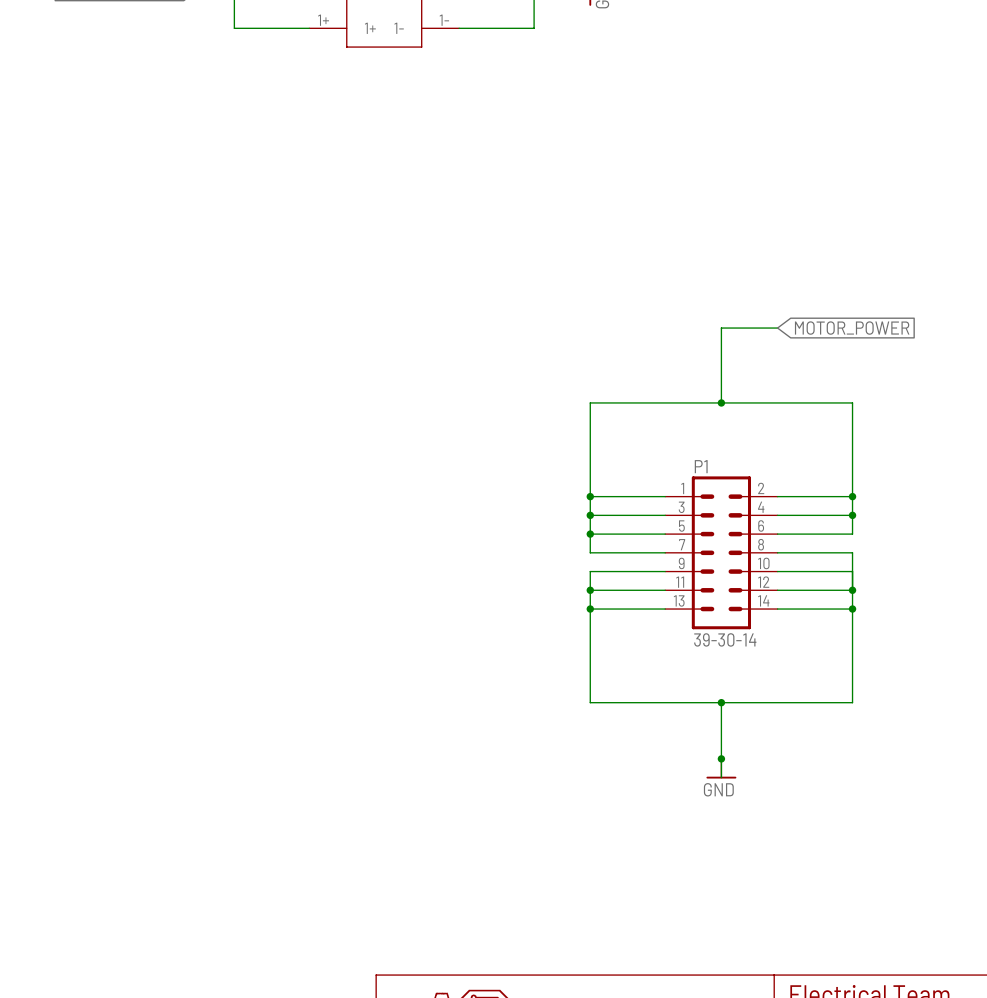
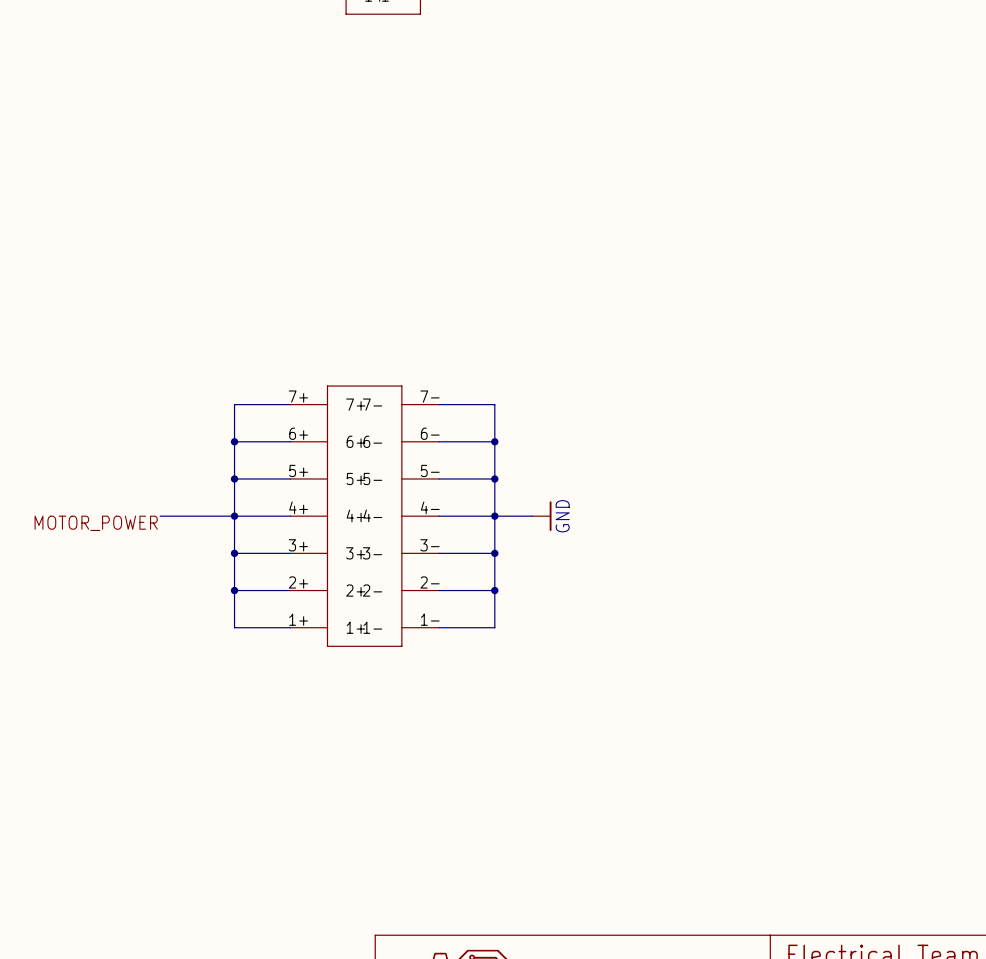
wire: (777, 328) (721, 328) (721, 402) -> none
global label: MOTOR_POWER (852, 328) -> none
junction: (721, 402) -> none
wire: none -> (290, 404) (234, 404) (234, 627) (290, 627)
wire: none -> (439, 404) (494, 404) (494, 627) (439, 627)
wire: none -> (234, 441) (290, 441)
junction: none -> (234, 441)
wire: none -> (439, 441) (494, 441)
junction: none -> (494, 441)
wire: (590, 496) (665, 496) -> none
junction: (590, 496) -> none
wire: (777, 496) (852, 496) -> none
junction: (852, 496) -> none
wire: none -> (234, 478) (290, 478)
junction: none -> (234, 478)
wire: none -> (439, 478) (494, 478)
junction: none -> (494, 478)
wire: (590, 515) (665, 515) -> none
junction: (590, 515) -> none
wire: (777, 515) (852, 515) -> none
junction: (852, 515) -> none
wire: (590, 534) (665, 534) -> none
junction: (590, 534) -> none
wire: (777, 534) (852, 534) (852, 402) (590, 402) (590, 552) (665, 552) -> none
wire: none -> (160, 516) (290, 516)
junction: none -> (234, 516)
part: none -> (364, 516)
wire: none -> (439, 516) (531, 516)
junction: none -> (494, 516)
power symbol: none -> GND (541, 516)
P1: 39-30-14 (721, 552) -> none
wire: (777, 552) (852, 552) (852, 702) (590, 702) (590, 571) (665, 571) -> none
label: none -> MOTOR_POWER (96, 523)
wire: (777, 571) (852, 571) -> none
wire: none -> (234, 553) (290, 553)
junction: none -> (234, 553)
wire: none -> (439, 553) (494, 553)
junction: none -> (494, 553)
wire: (590, 590) (665, 590) -> none
junction: (590, 590) -> none
wire: (777, 590) (852, 590) -> none
junction: (852, 590) -> none
wire: (590, 609) (665, 609) -> none
junction: (590, 609) -> none
wire: (777, 609) (852, 609) -> none
junction: (852, 609) -> none
wire: none -> (234, 590) (290, 590)
junction: none -> (234, 590)
wire: none -> (439, 590) (494, 590)
junction: none -> (494, 590)
wire: (721, 702) (721, 777) -> none
junction: (721, 702) -> none
junction: (721, 758) -> none
power symbol: GND (721, 768) -> none

